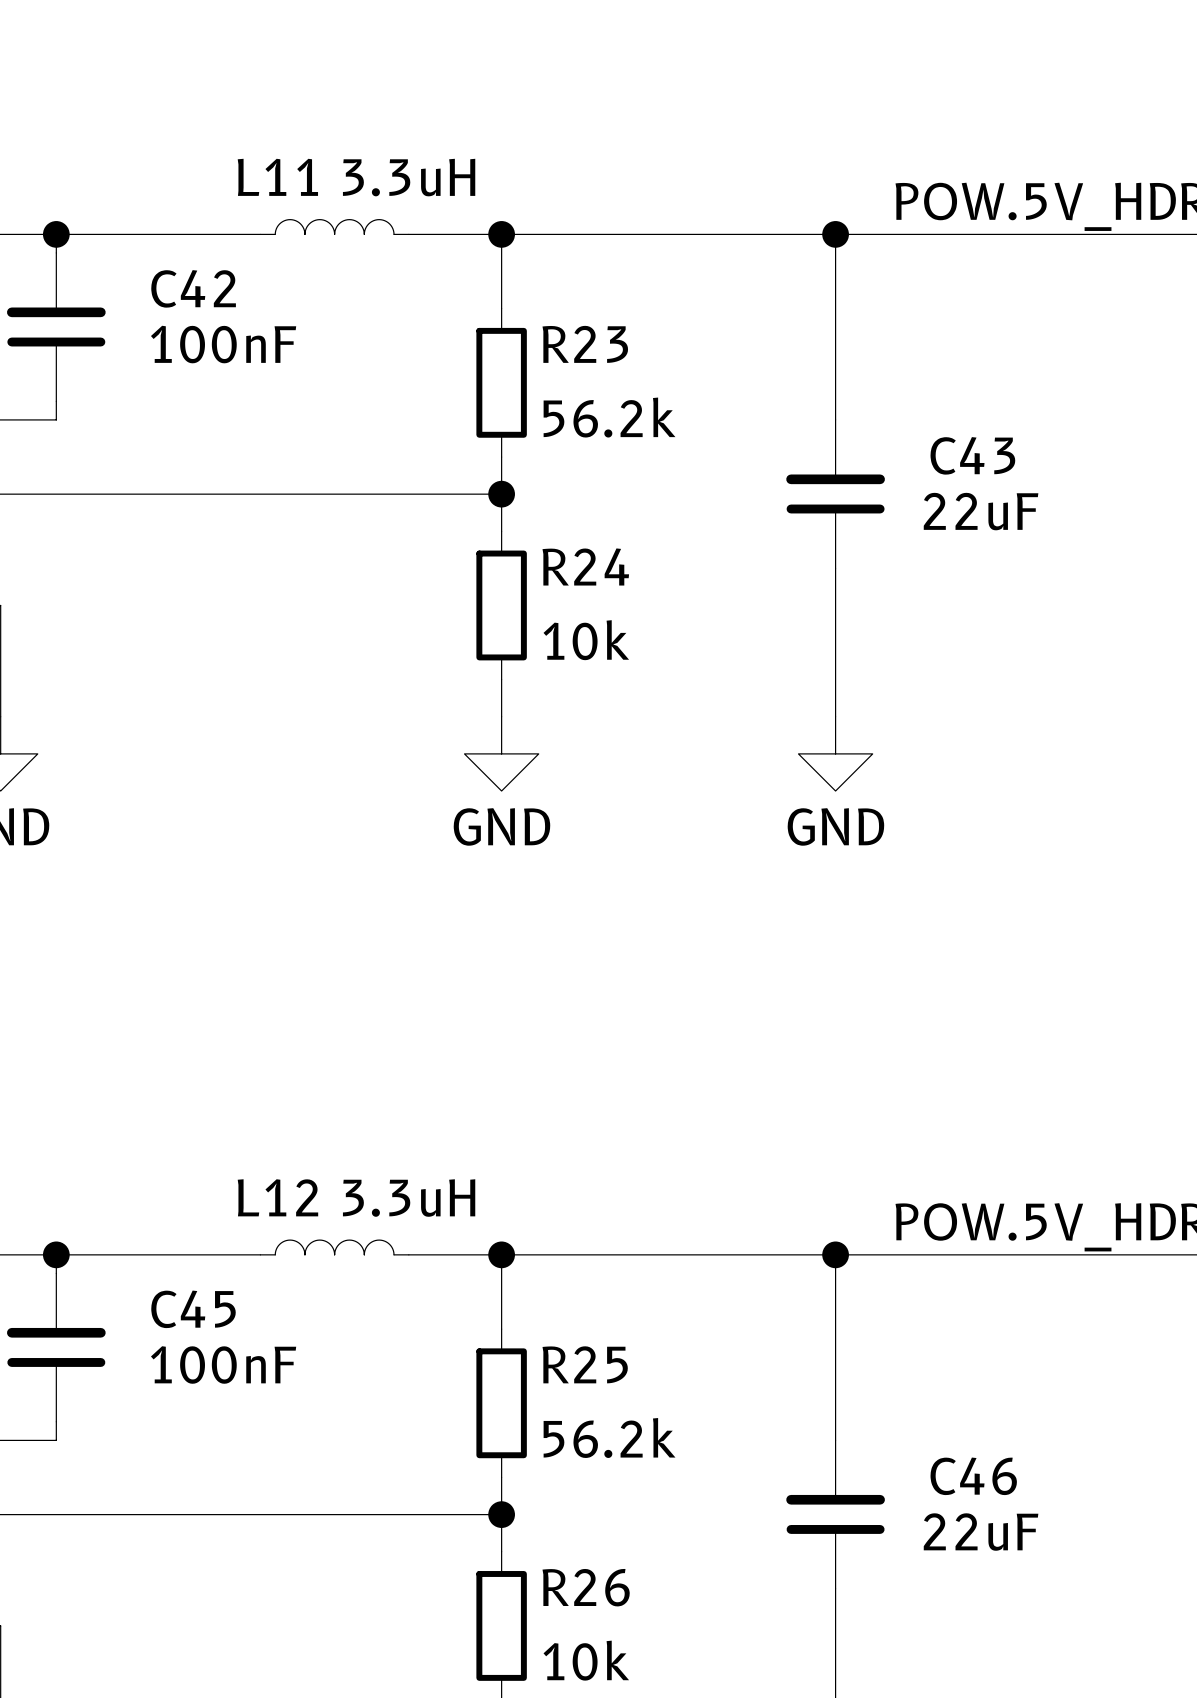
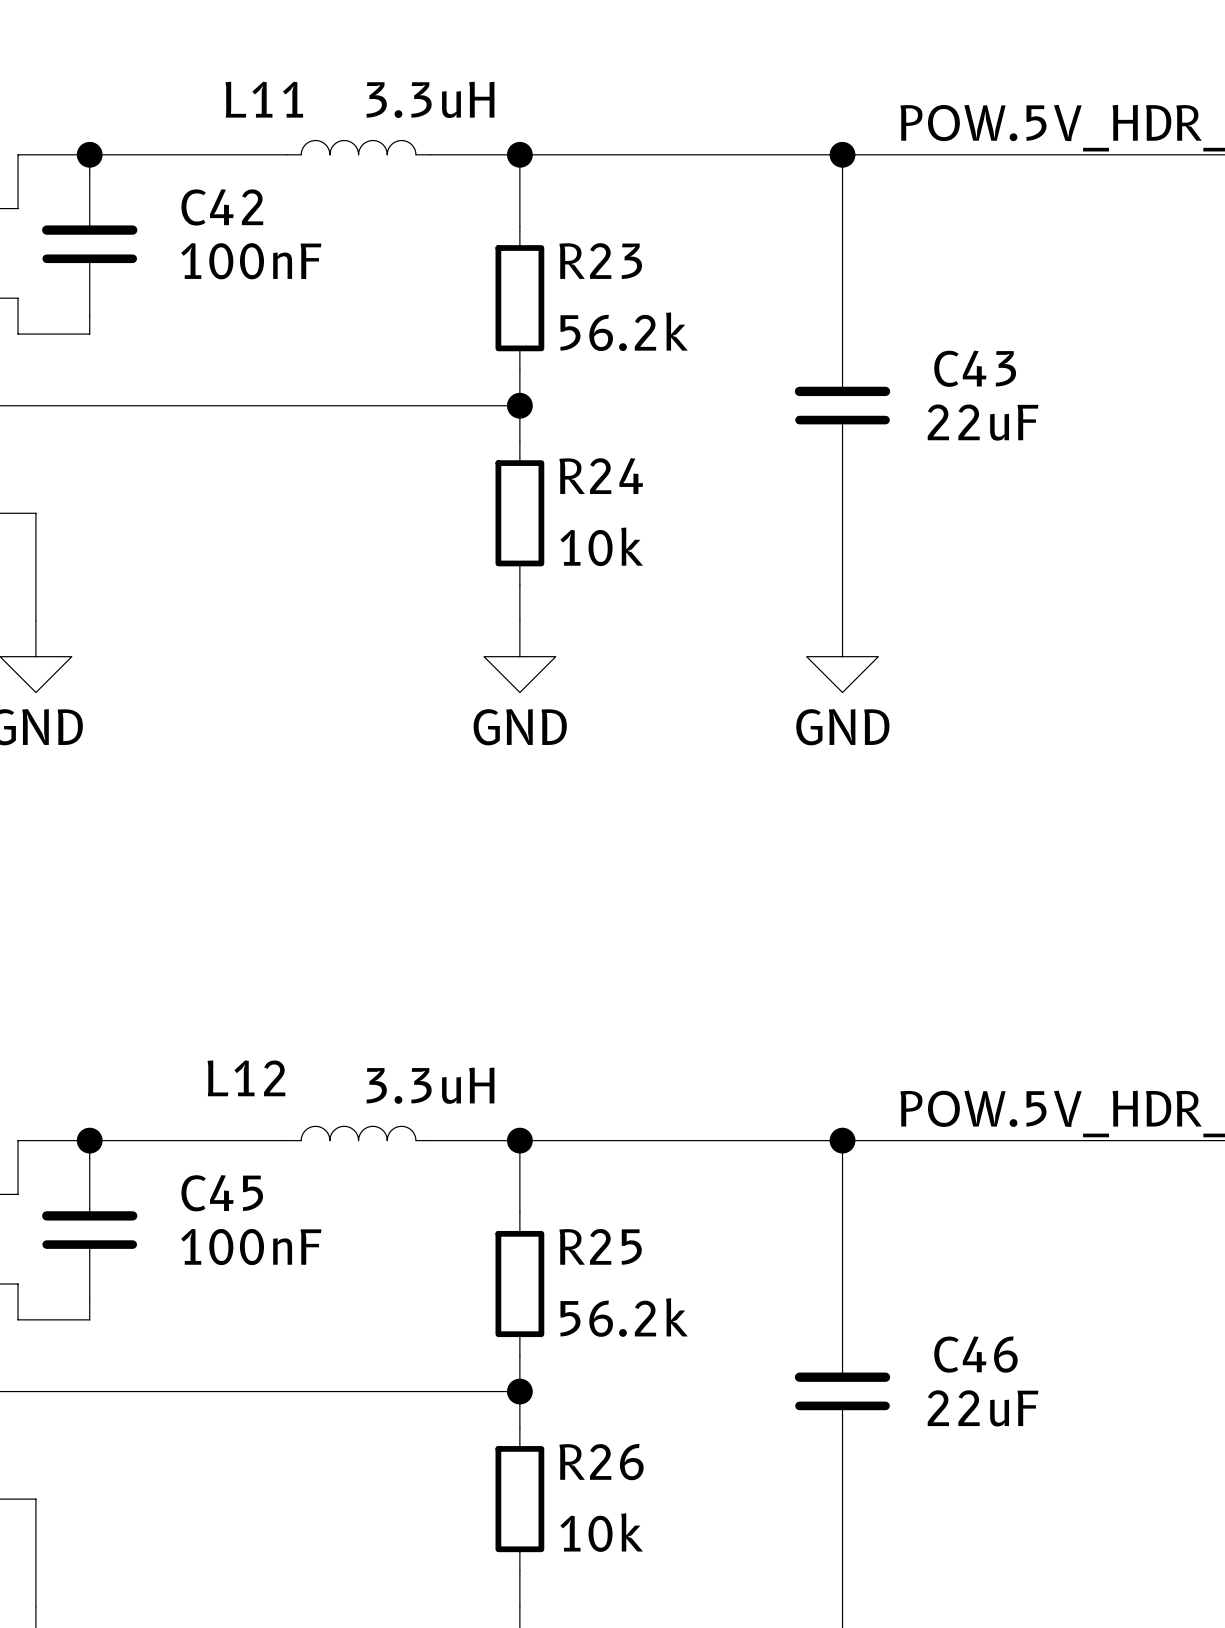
L11 name position: L11 (277, 177) -> L11 (264, 99)
L12 name position: L12 (277, 1197) -> L12 (246, 1078)

